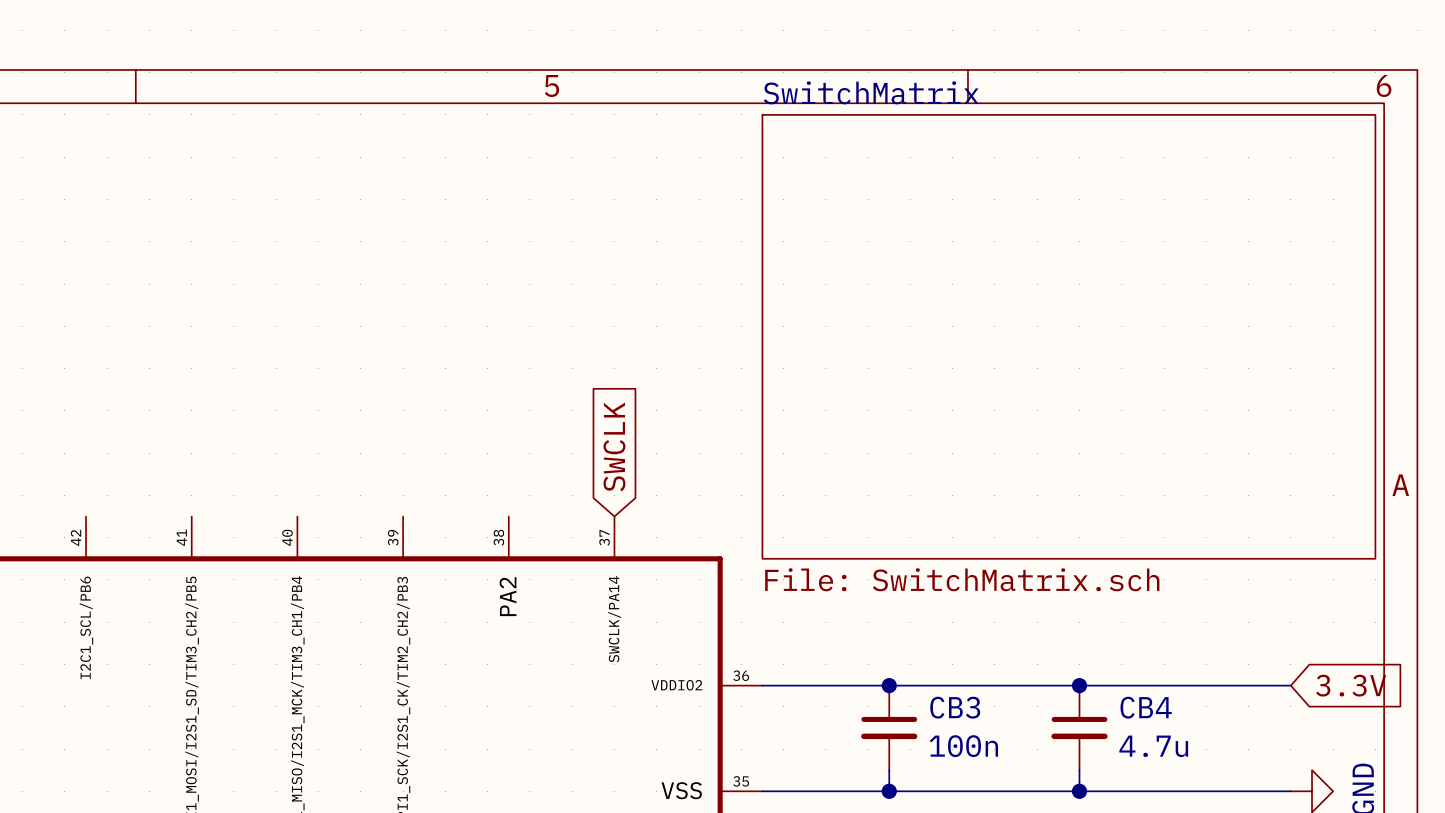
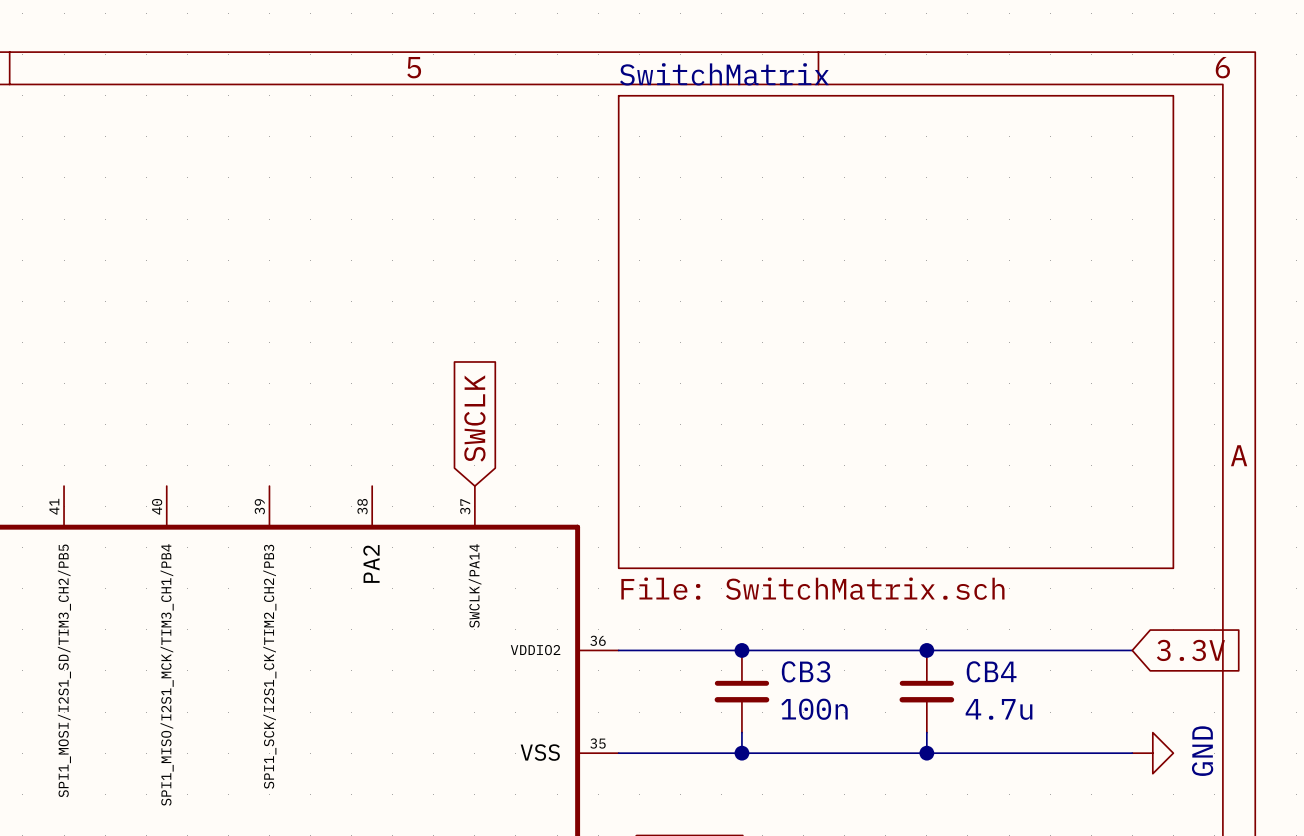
sheet SwitchMatrix: File: SwitchMatrix.sch (1068, 336) -> none
sheet SwitchMatrix: none -> File: SwitchMatrix.sch (896, 332)

